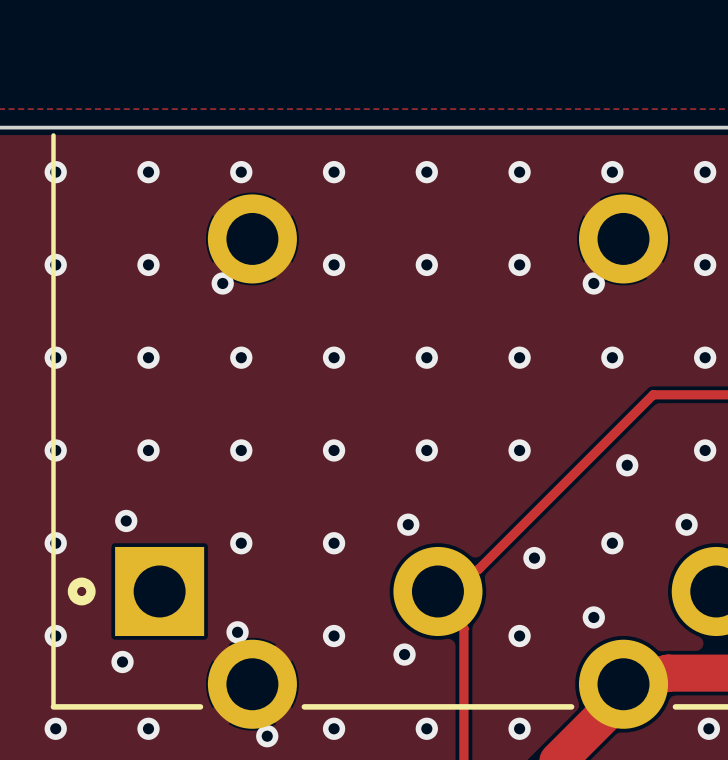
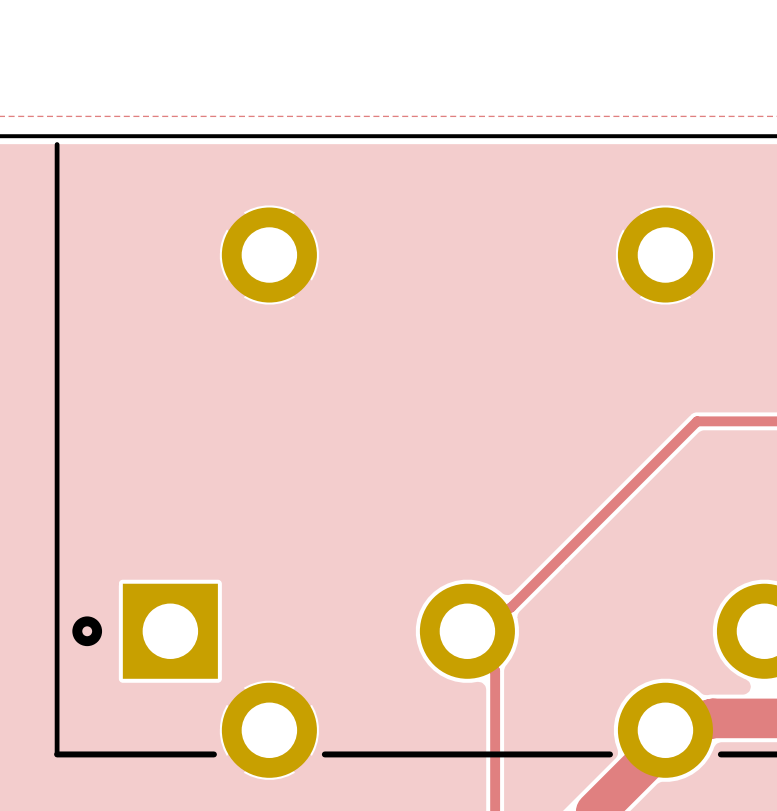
via: (55, 172) -> none
via: (148, 172) -> none
via: (241, 172) -> none
via: (334, 172) -> none
via: (426, 172) -> none
via: (519, 172) -> none
via: (612, 172) -> none
via: (705, 172) -> none
via: (55, 264) -> none
via: (148, 264) -> none
via: (334, 264) -> none
via: (426, 264) -> none
via: (519, 264) -> none
via: (705, 264) -> none
via: (222, 283) -> none
via: (593, 283) -> none
via: (55, 357) -> none
via: (148, 357) -> none
via: (241, 357) -> none
via: (334, 357) -> none
via: (426, 357) -> none
via: (519, 357) -> none
via: (612, 357) -> none
via: (705, 357) -> none
via: (55, 450) -> none
via: (148, 450) -> none
via: (241, 450) -> none
via: (334, 450) -> none
via: (426, 450) -> none
via: (519, 450) -> none
via: (705, 450) -> none
via: (627, 465) -> none
via: (126, 520) -> none
via: (408, 524) -> none
via: (686, 524) -> none
via: (55, 543) -> none
via: (241, 543) -> none
via: (334, 543) -> none
via: (612, 543) -> none
via: (534, 558) -> none
via: (593, 617) -> none
via: (237, 632) -> none
via: (55, 636) -> none
via: (334, 636) -> none
via: (519, 636) -> none
via: (404, 654) -> none
via: (122, 661) -> none
via: (55, 728) -> none
via: (148, 728) -> none
via: (334, 728) -> none
via: (426, 728) -> none
via: (519, 728) -> none
via: (708, 728) -> none
via: (267, 736) -> none

